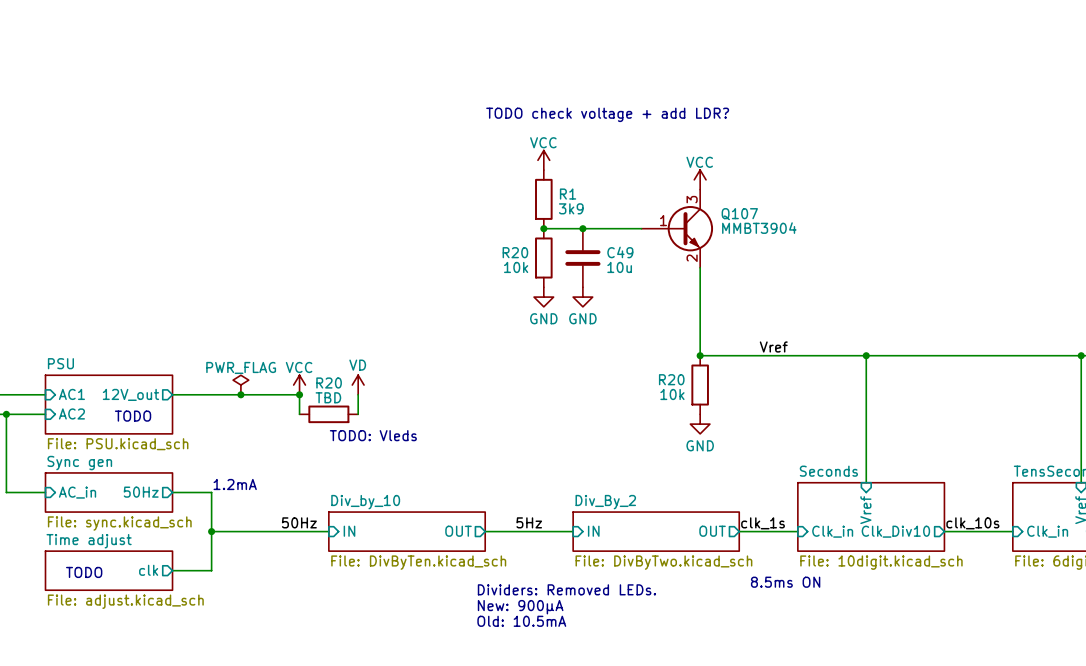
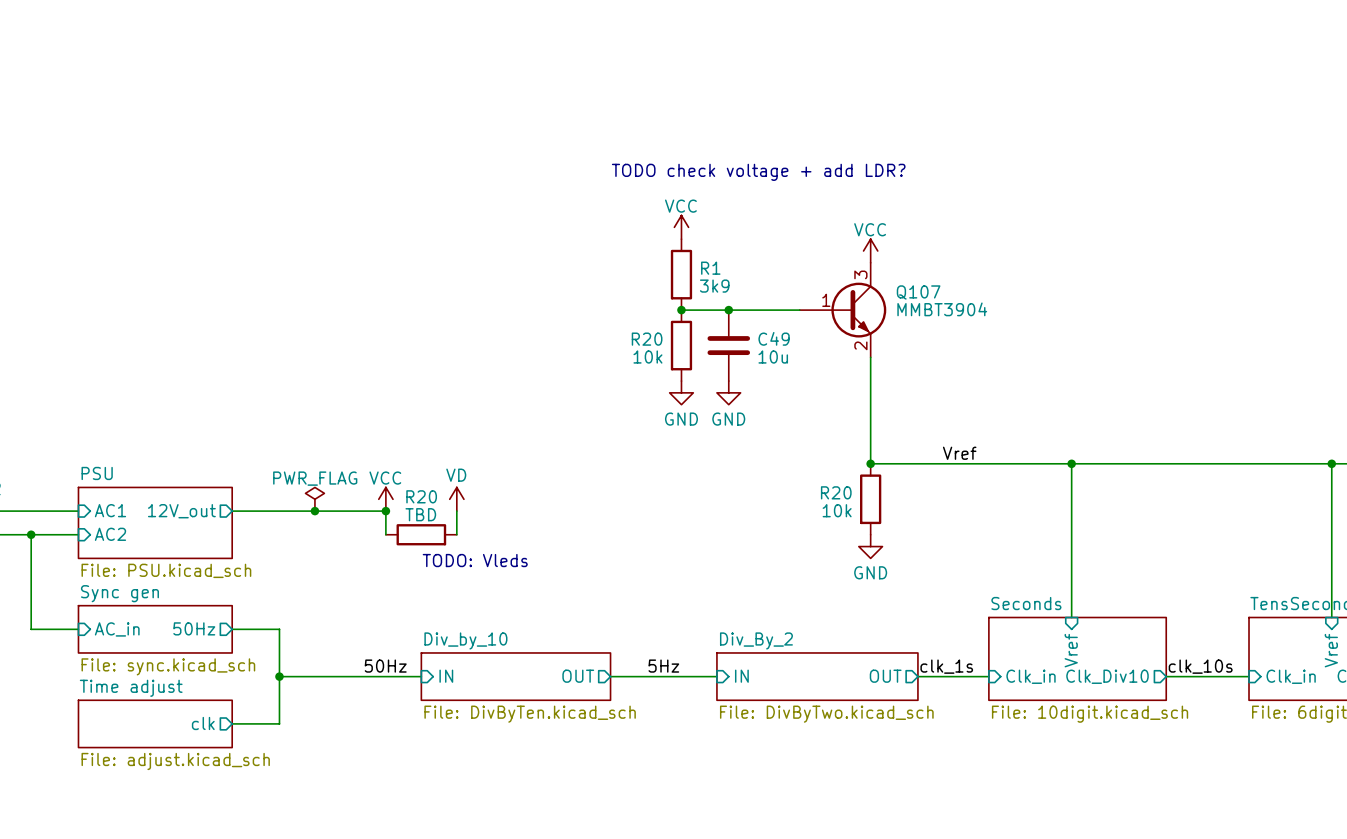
text: TODO (133, 416) -> none
text: 1.2mA (235, 484) -> none
text: TODO (84, 572) -> none
text: 8.5ms ON (785, 582) -> none
text: Dividers: Removed LEDs. (566, 589) -> none
text: New: 900µA (520, 607) -> none
text: Old: 10.5mA (521, 621) -> none

